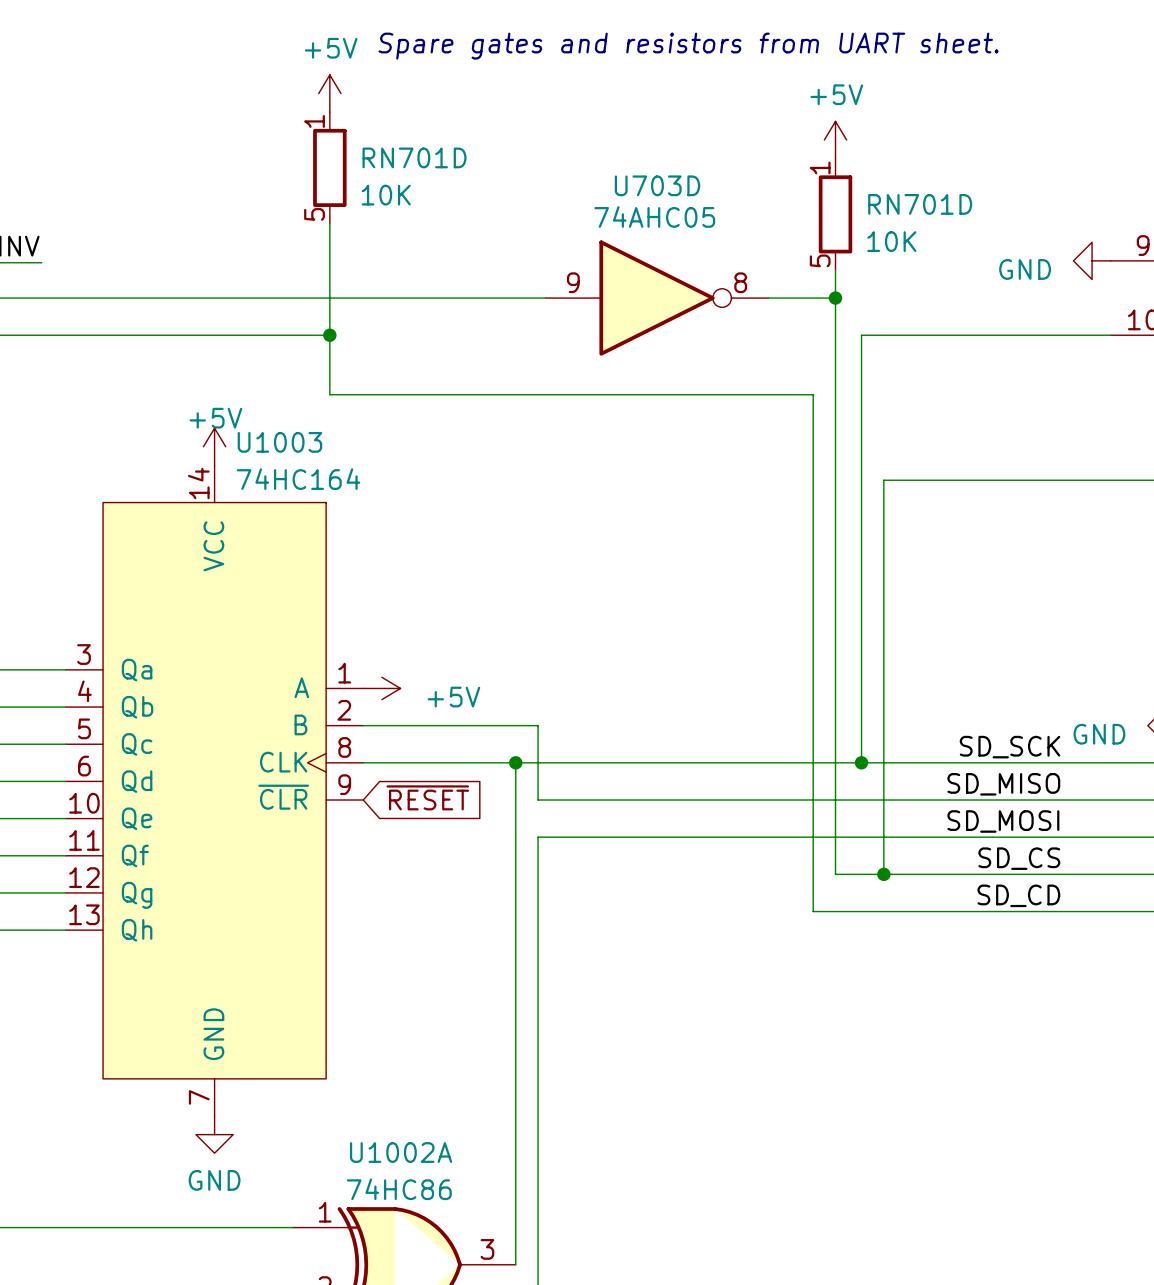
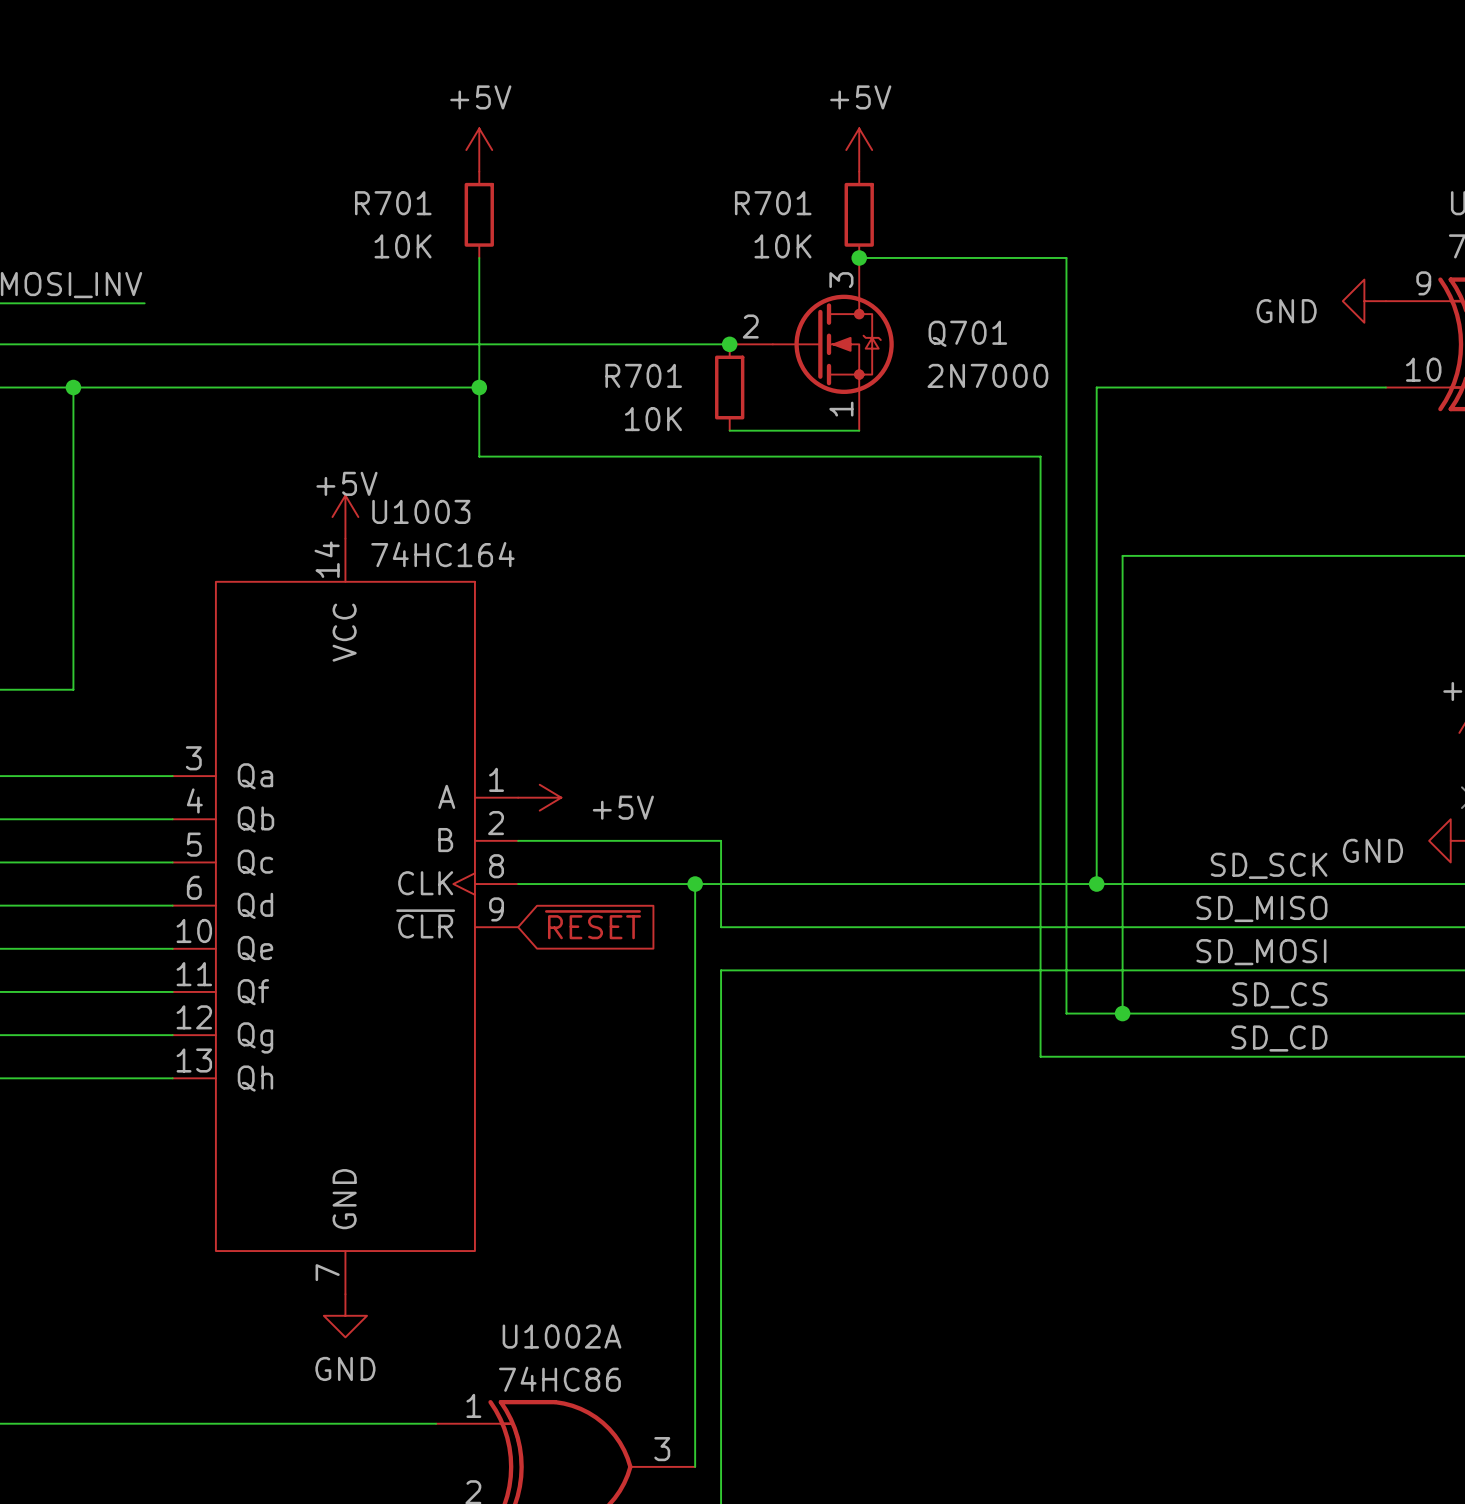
text: Spare gates and resistors from UART sheet. (688, 46) -> none
power symbol position: +5V (329, 93) -> +5V (479, 150)
power symbol: none -> +5V (859, 150)
power symbol: +5V (835, 140) -> none
RN701D: 10K (329, 167) -> none
R701: none -> 10K (479, 214)
R701: none -> 10K (859, 214)
RN701D: 10K (835, 214) -> none
wire: none -> (859, 257) (1066, 257) (1066, 311)
junction: none -> (859, 257)
junction: none -> (729, 344)
Q701: none -> 2N7000 (811, 344)
U703D: 74AHC05 (657, 298) -> none
wire: (768, 298) (835, 298) -> none
junction: (835, 298) -> none
R701: none -> 10K (729, 387)
wire: none -> (729, 430) (859, 430)

